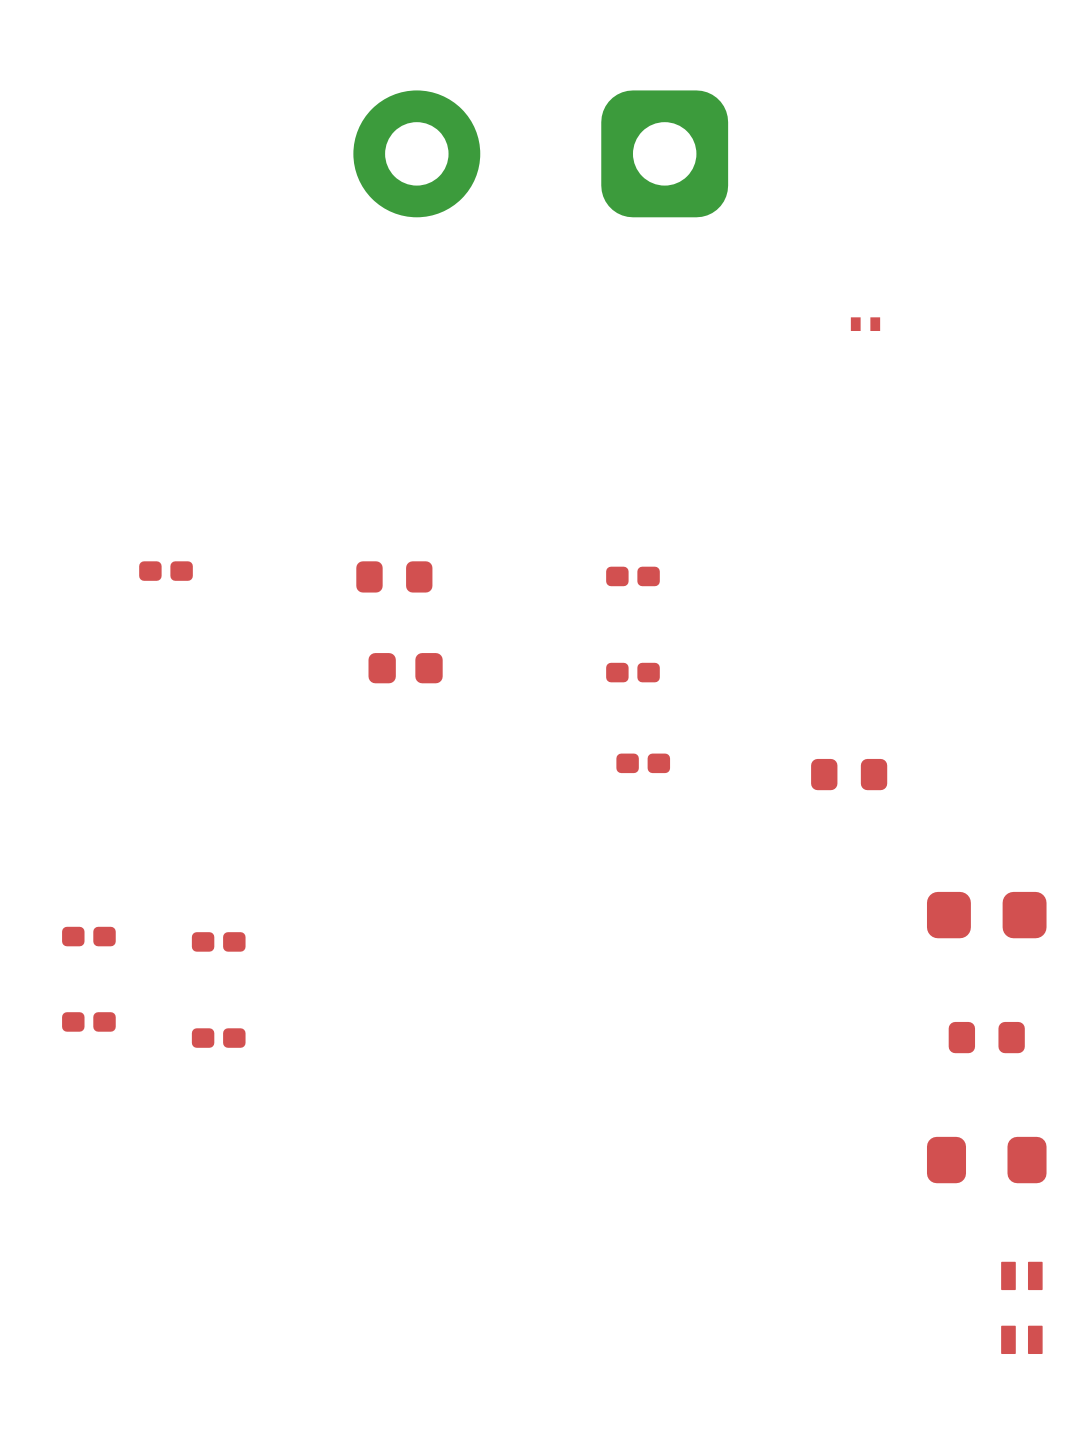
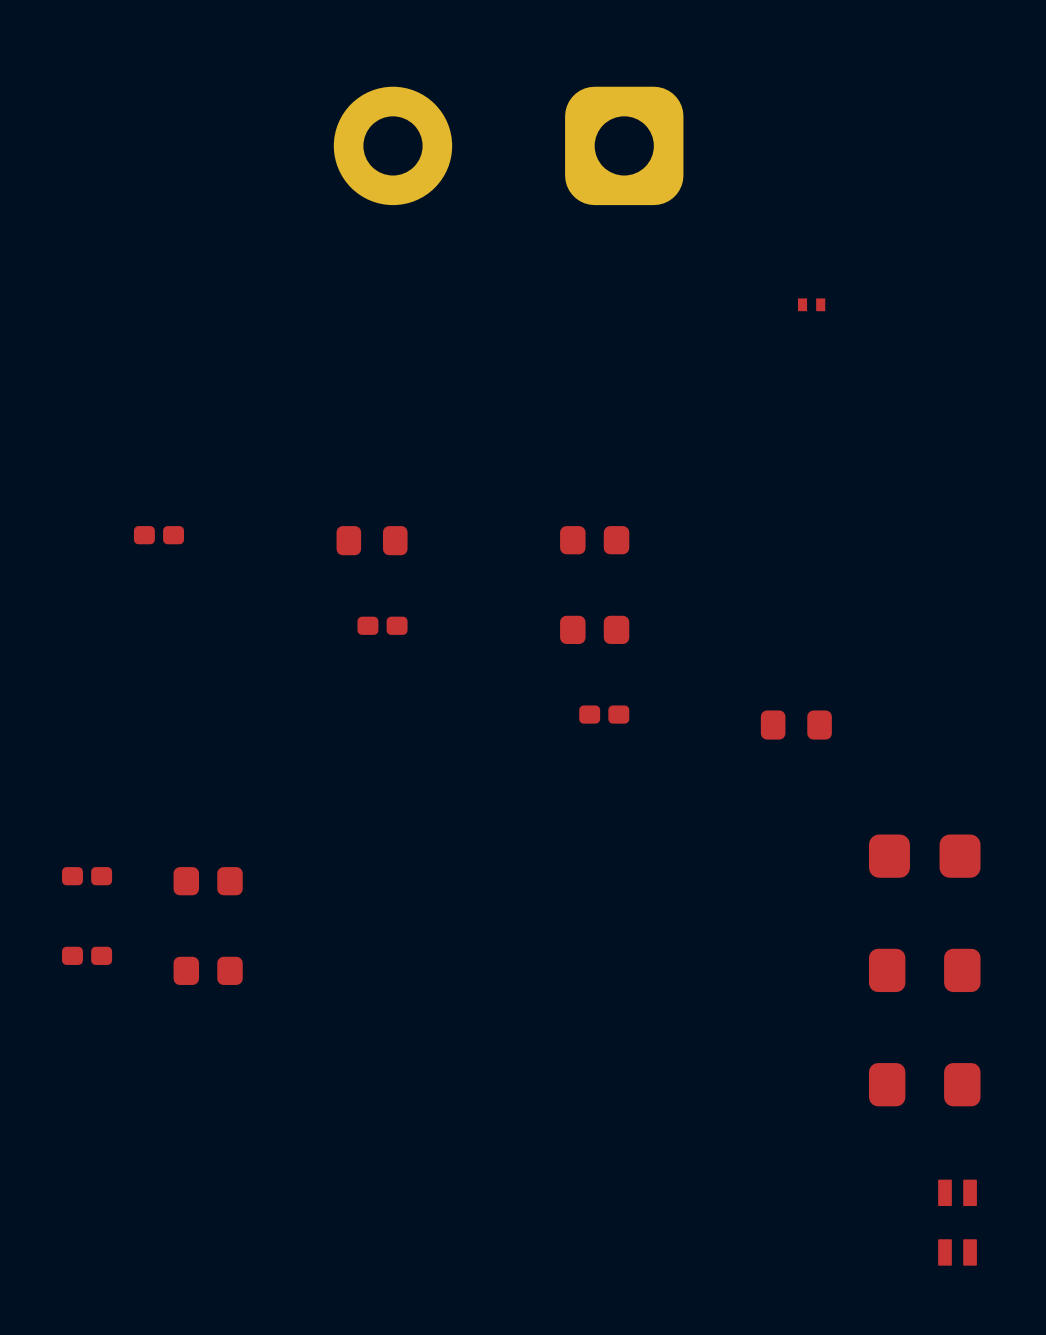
part footprint: [606, 566, 660, 587] -> [560, 526, 630, 555]
part footprint: [368, 653, 443, 684] -> [357, 616, 408, 635]
part footprint: [606, 662, 660, 683] -> [560, 615, 630, 644]
part footprint: [191, 932, 246, 952] -> [173, 867, 243, 896]
part footprint: [948, 1021, 1025, 1054] -> [868, 948, 981, 993]
part footprint: [191, 1028, 246, 1048] -> [173, 956, 243, 985]

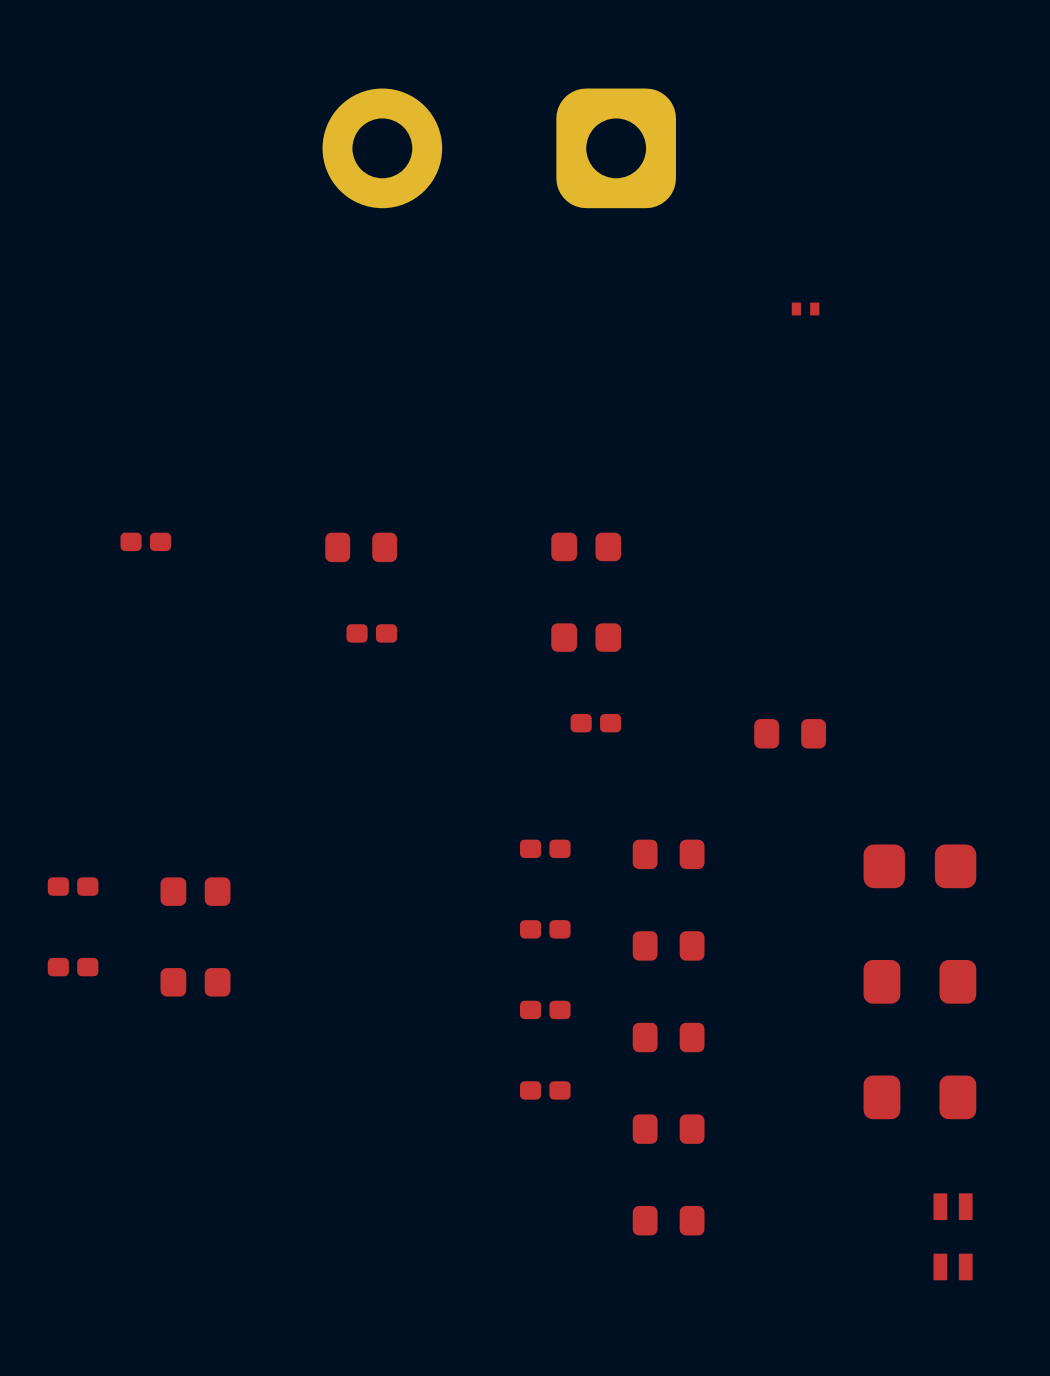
part: none -> (545, 848)
part: none -> (668, 854)
part: none -> (545, 929)
part: none -> (668, 945)
part: none -> (545, 1009)
part: none -> (668, 1037)
part: none -> (545, 1090)
part: none -> (668, 1129)
part: none -> (668, 1220)

